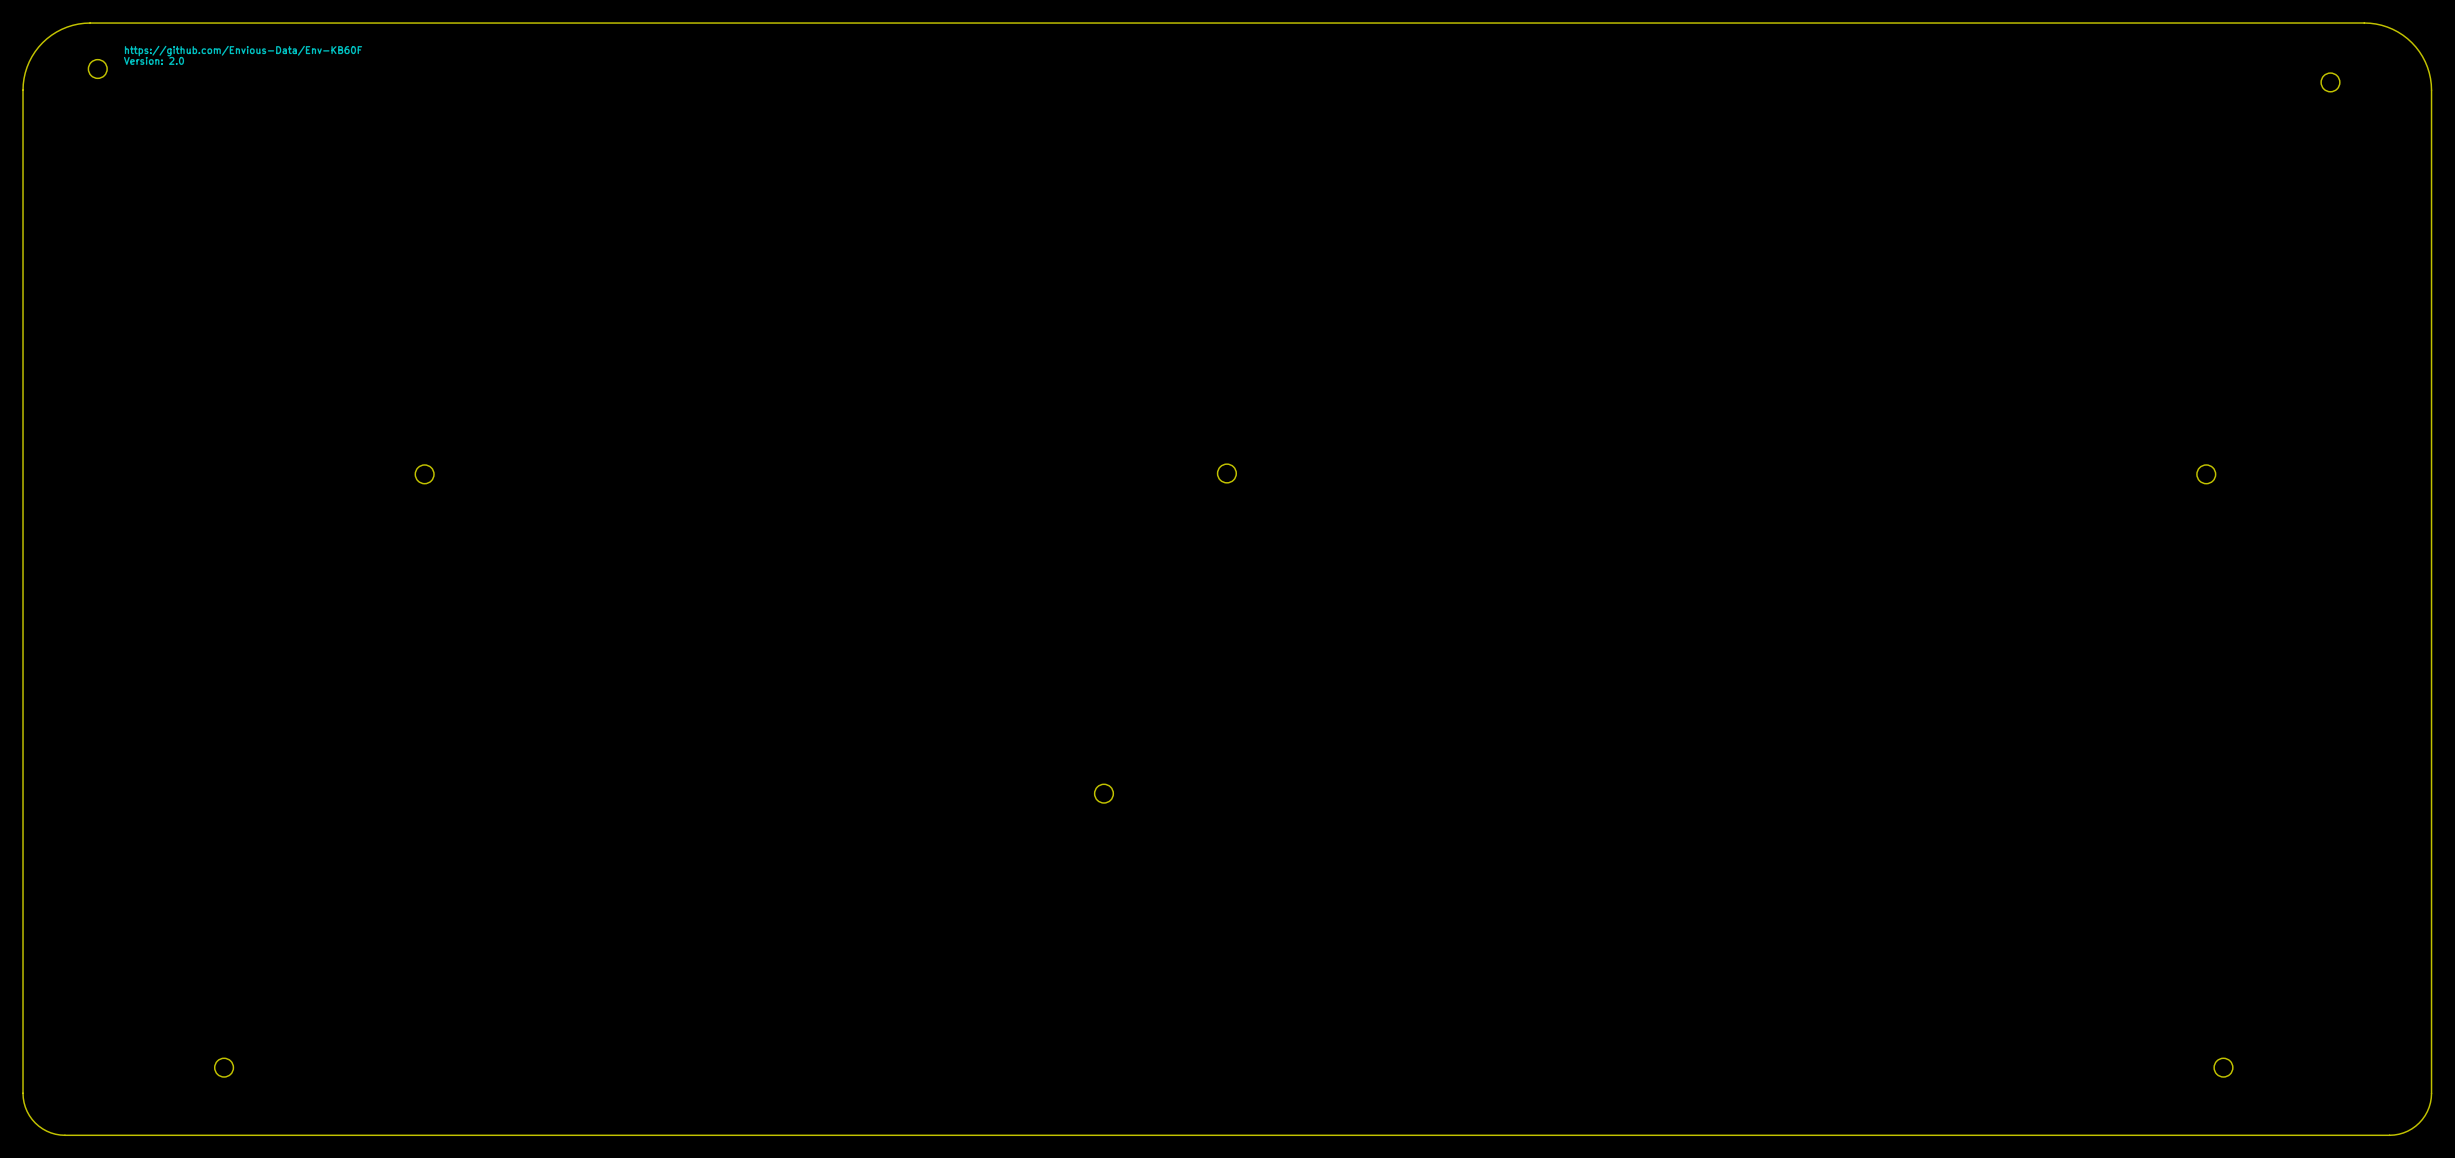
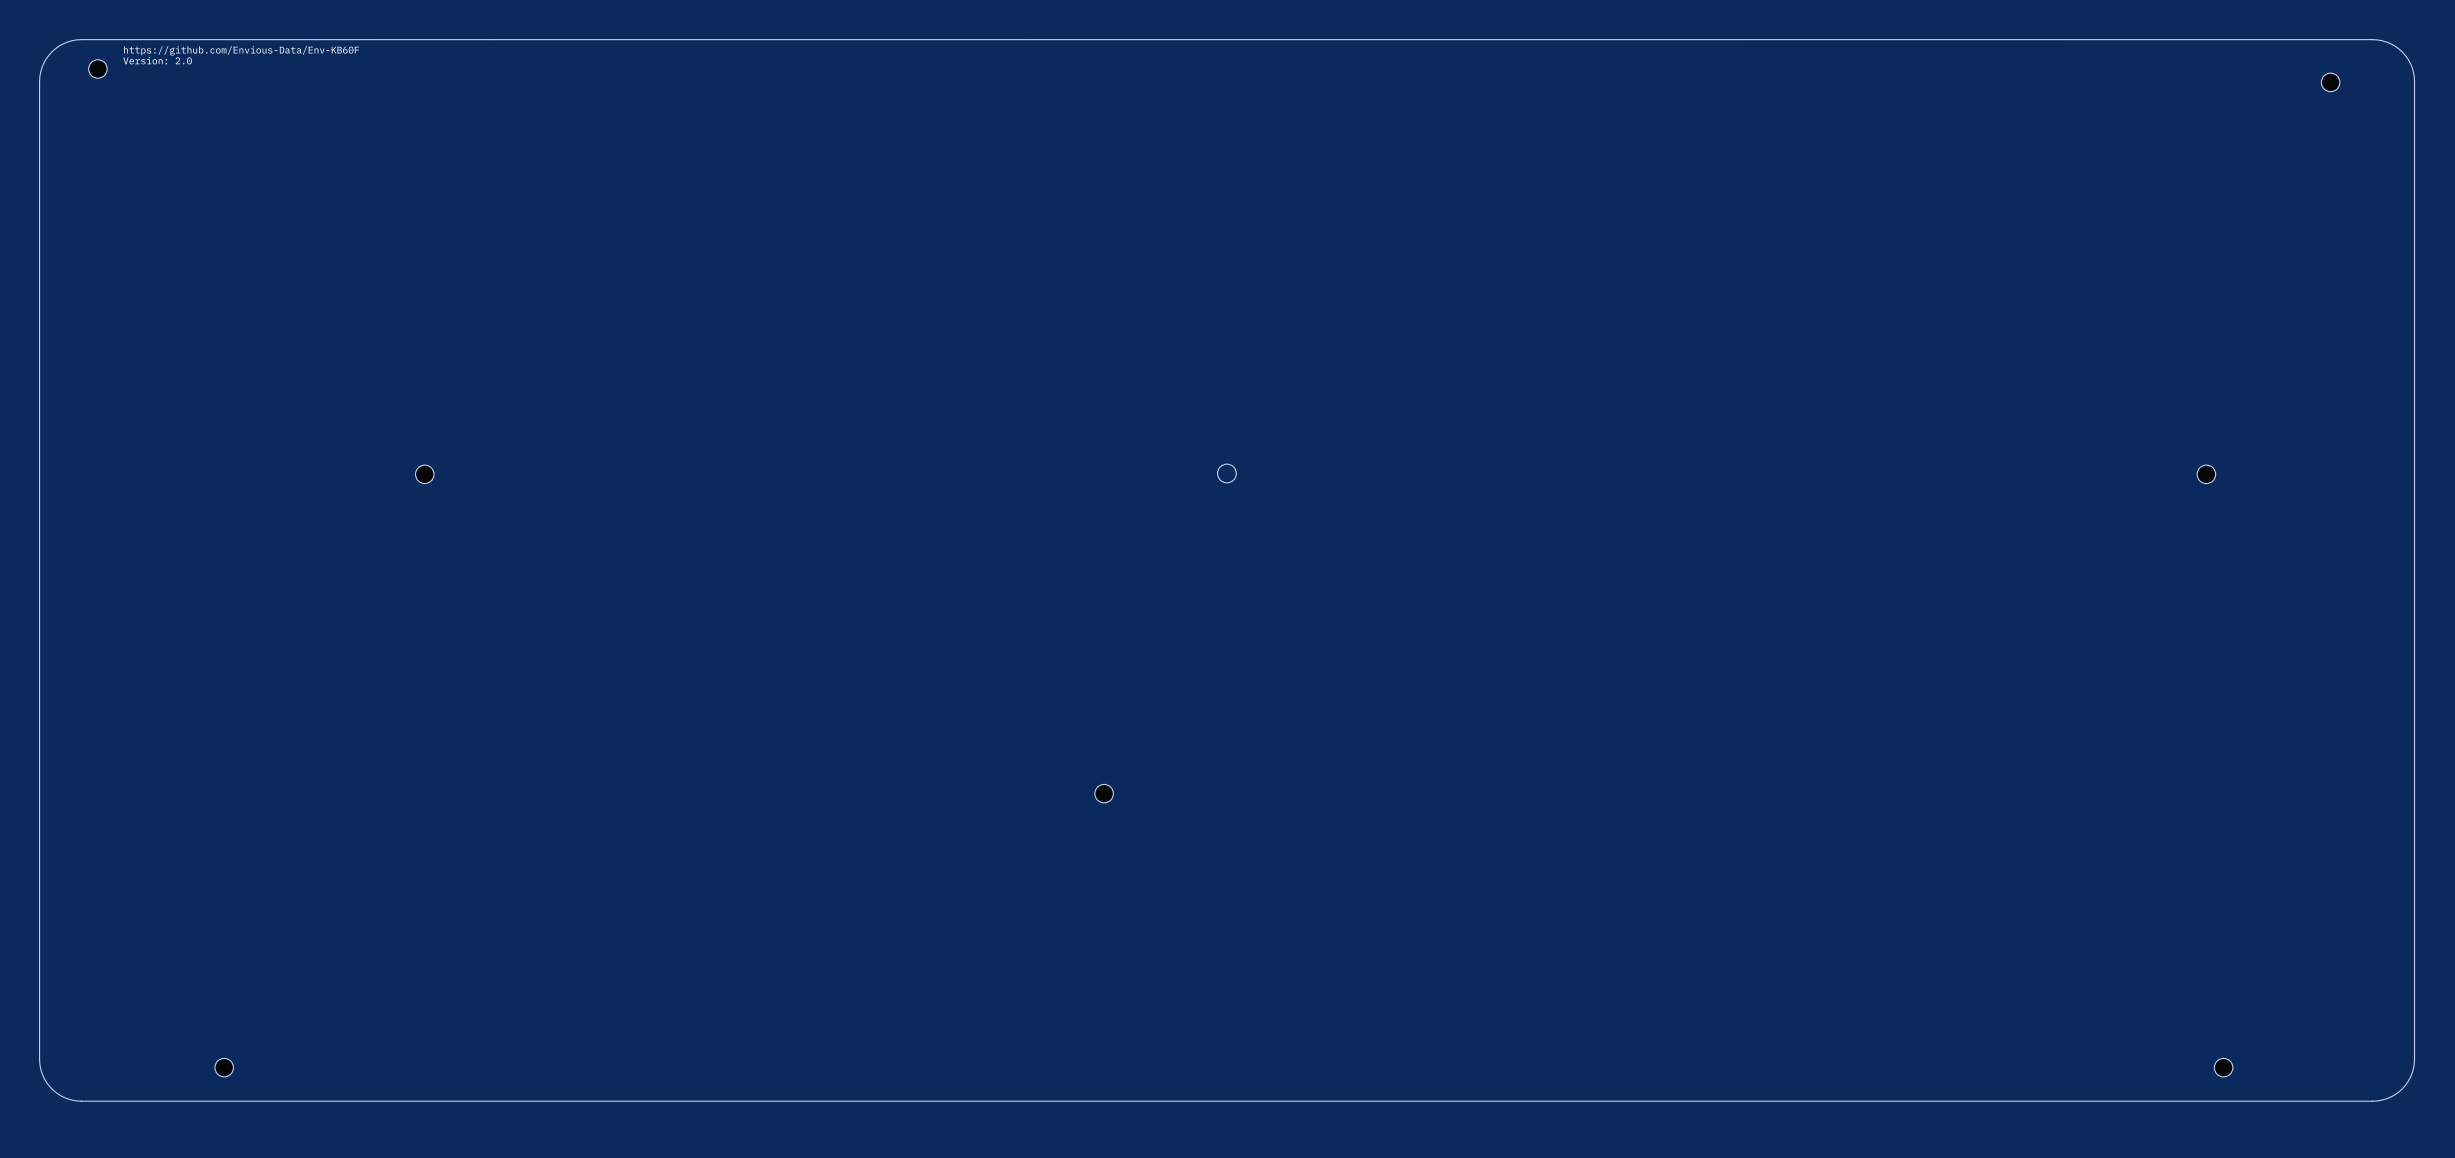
board edge: (2364, 23) (90, 23) (78, 24) (61, 29) (46, 38) (35, 51) (27, 67) (23, 90) (23, 1093) (27, 1111) (35, 1123) (42, 1128) (51, 1132) (64, 1135) (2389, 1135) (2407, 1131) (2415, 1126) (2425, 1115) (2430, 1102) (2431, 1093) (2431, 90) (2429, 72) (2425, 61) (2411, 42) (2392, 29) (2381, 25) (2364, 23) -> (2372, 39) (2386, 41) (2402, 51) (2410, 63) (2414, 81) (2414, 1059) (2412, 1073) (2408, 1081) (2398, 1092) (2390, 1097) (2372, 1101) (81, 1101) (72, 1100) (59, 1094) (51, 1088) (43, 1077) (39, 1059) (39, 81) (41, 67) (46, 59) (51, 51) (63, 43) (81, 39) (2372, 39)
round board edge: [87, 59, 108, 79] -> none
part: none -> (97, 68)
round board edge: [2320, 72, 2341, 93] -> none
part: none -> (2330, 82)
round board edge: [414, 464, 435, 485] -> none
round board edge: [2196, 464, 2217, 485] -> none
part: none -> (424, 474)
part: none -> (2206, 474)
round board edge: [1094, 783, 1114, 804] -> none
part: none -> (1104, 793)
round board edge: [214, 1057, 234, 1078] -> none
round board edge: [2213, 1057, 2234, 1078] -> none
part: none -> (224, 1067)
part: none -> (2223, 1067)

